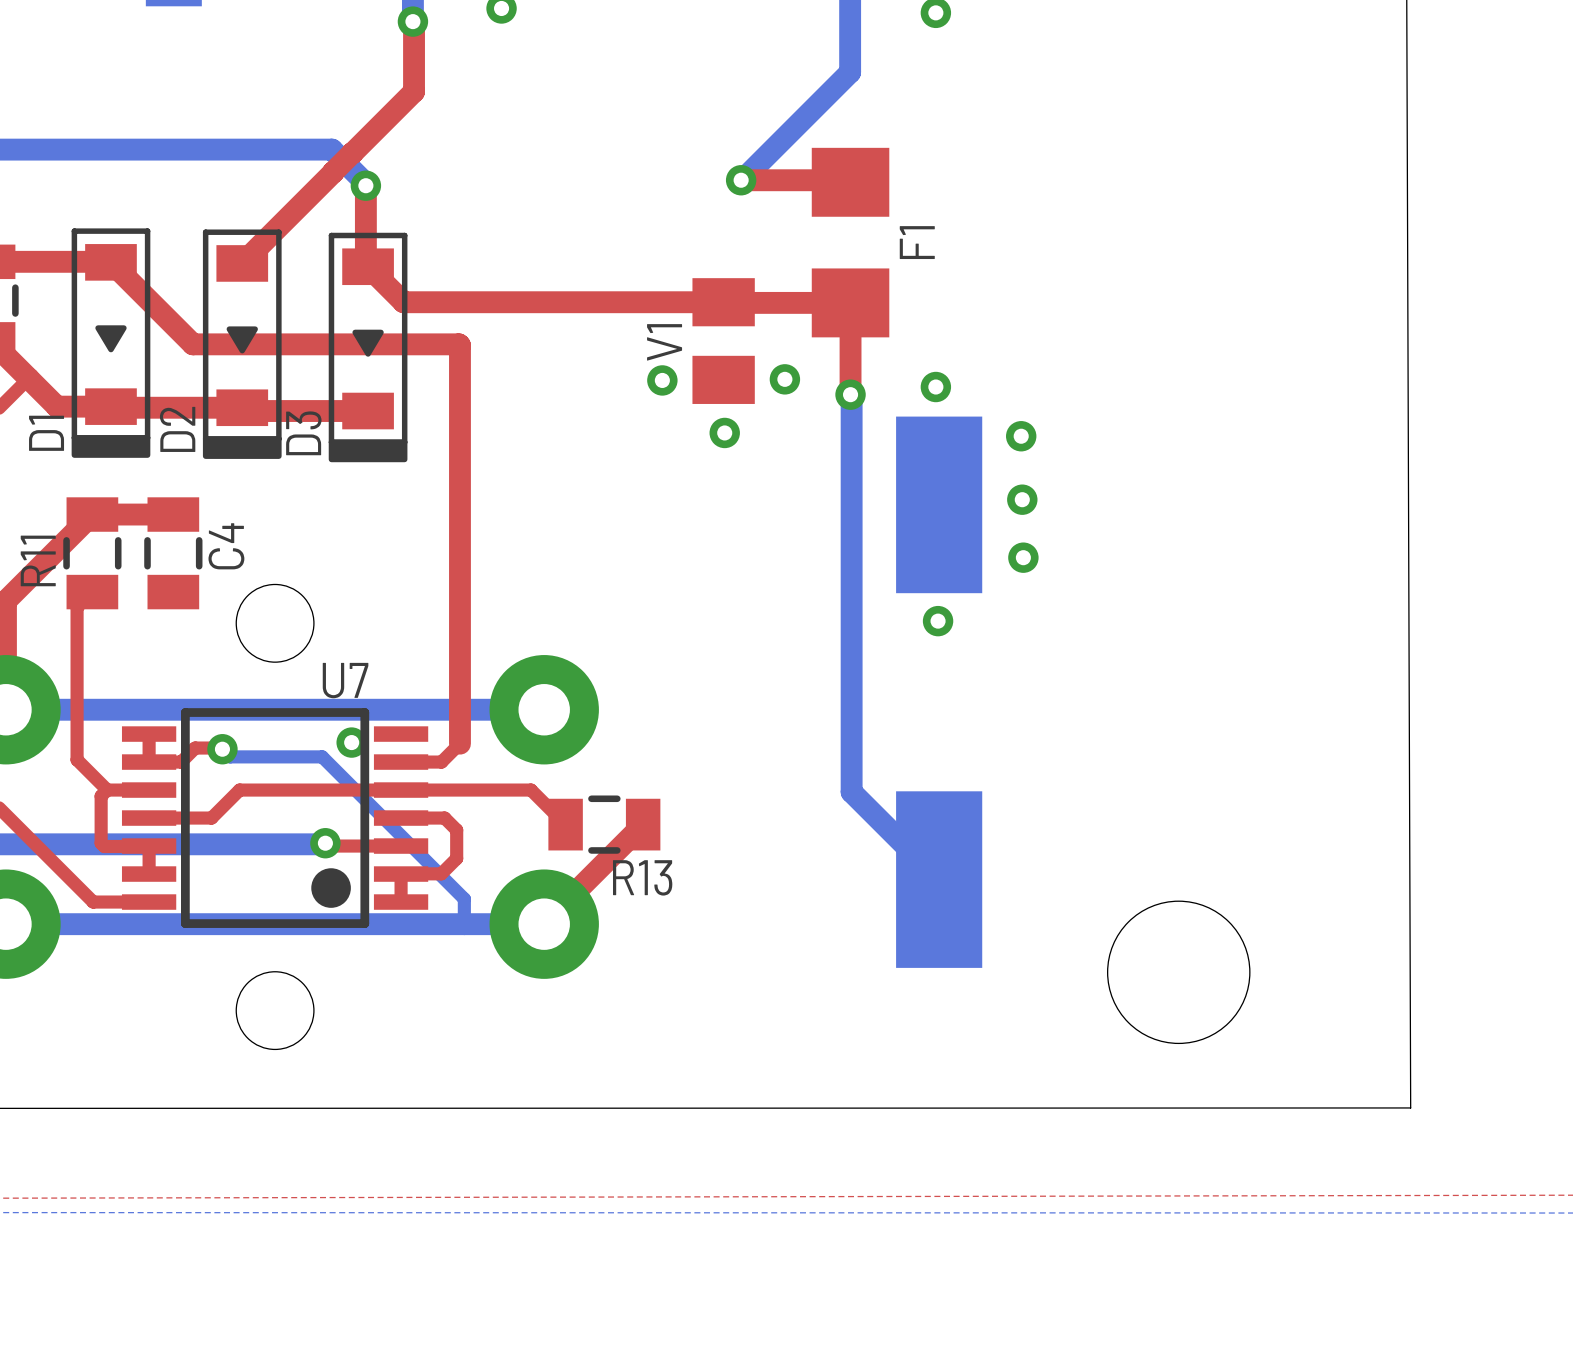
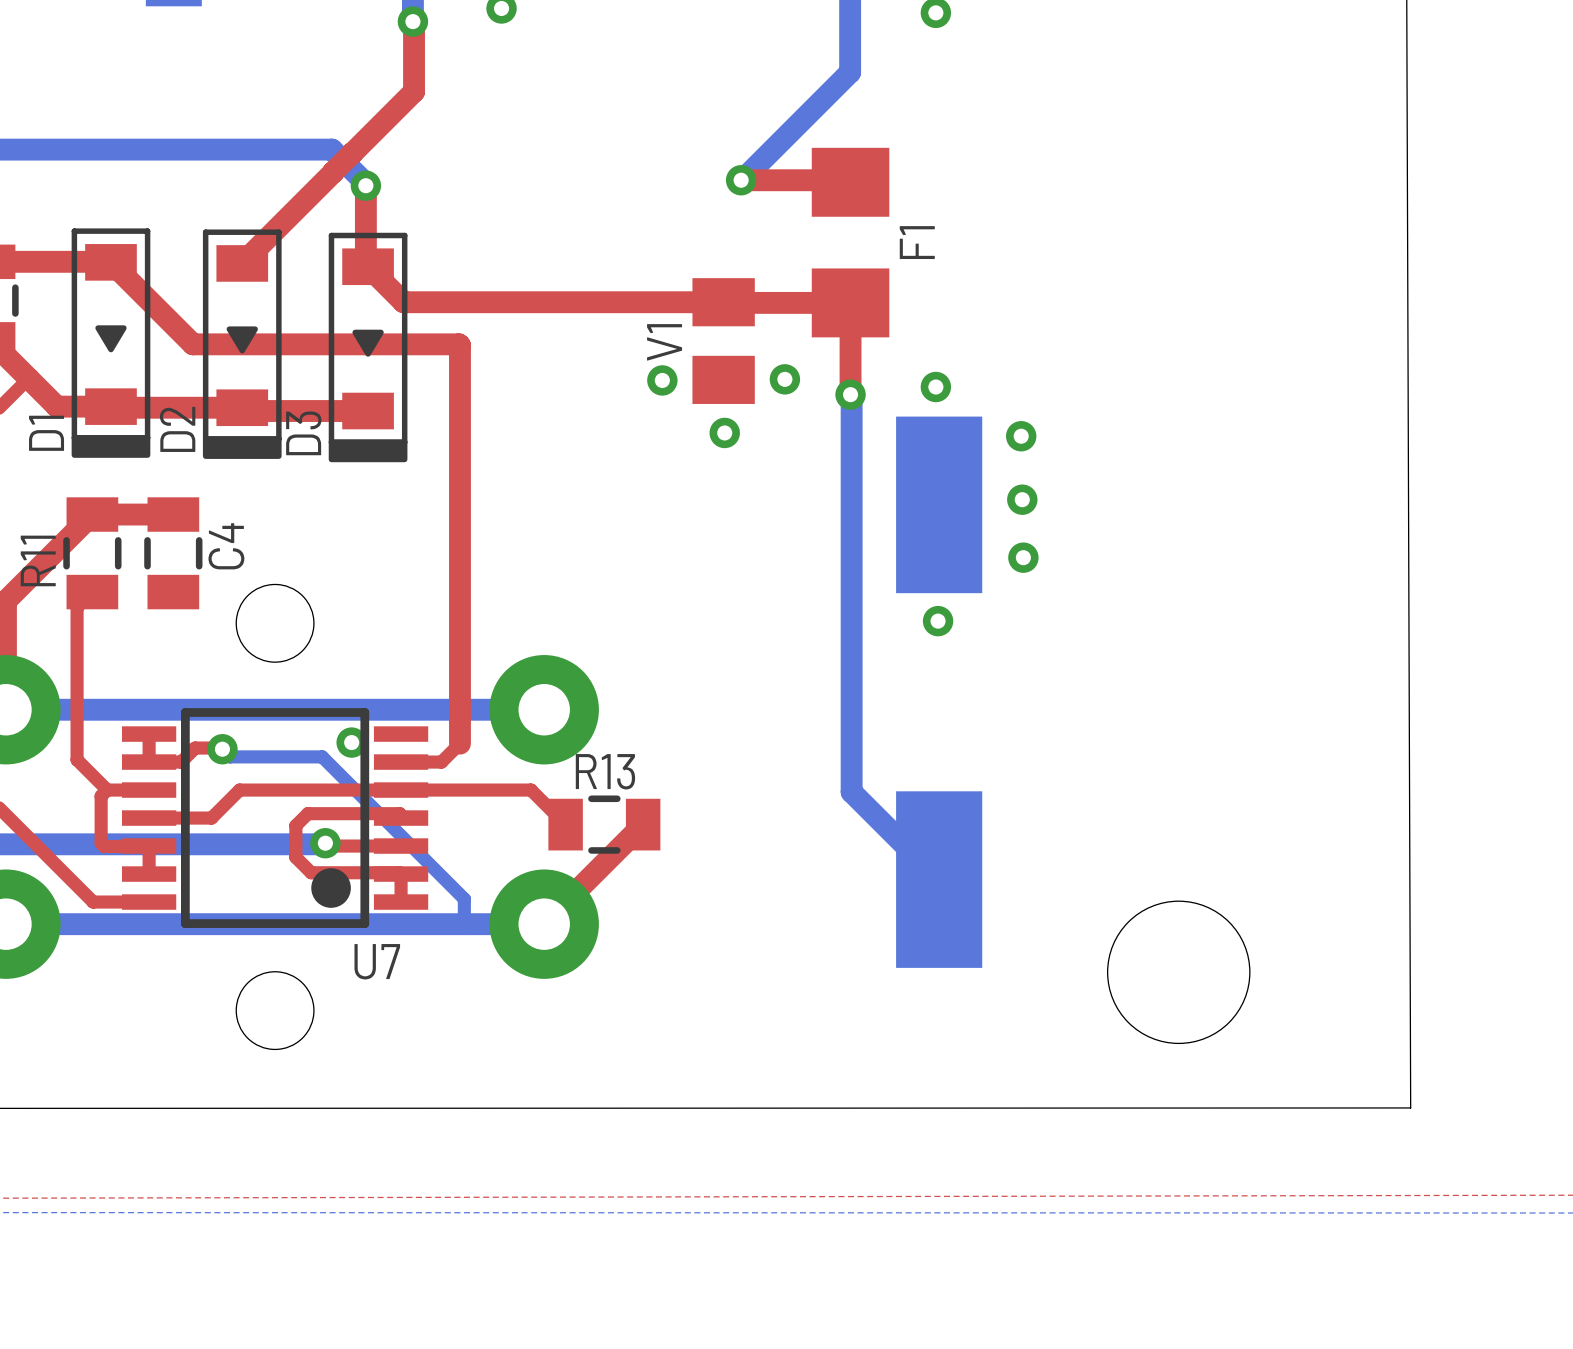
U7 name position: U7 (345, 680) -> U7 (377, 961)
top track: (401, 818) (444, 818) (456, 830) (456, 858) (441, 873) (401, 873) -> (401, 818) (399, 813) (307, 813) (295, 825) (295, 857) (311, 872) (401, 874)
R13 name position: R13 (642, 877) -> R13 (605, 771)

